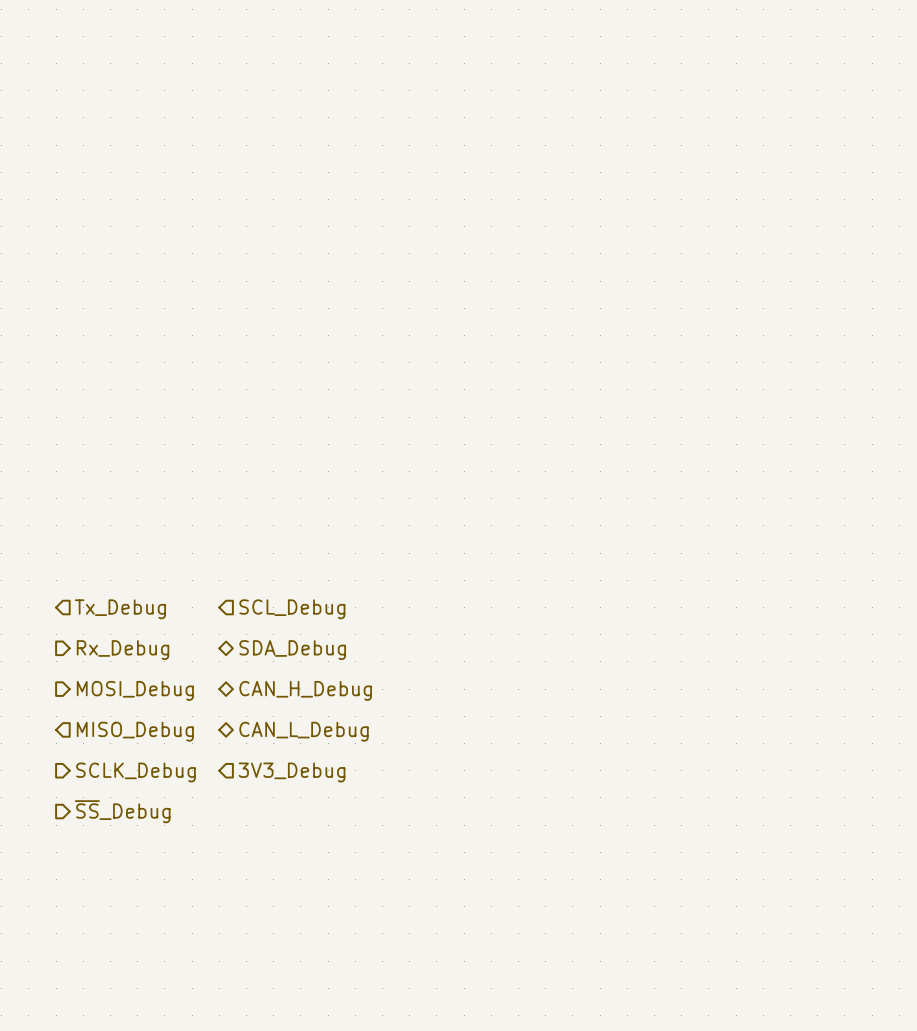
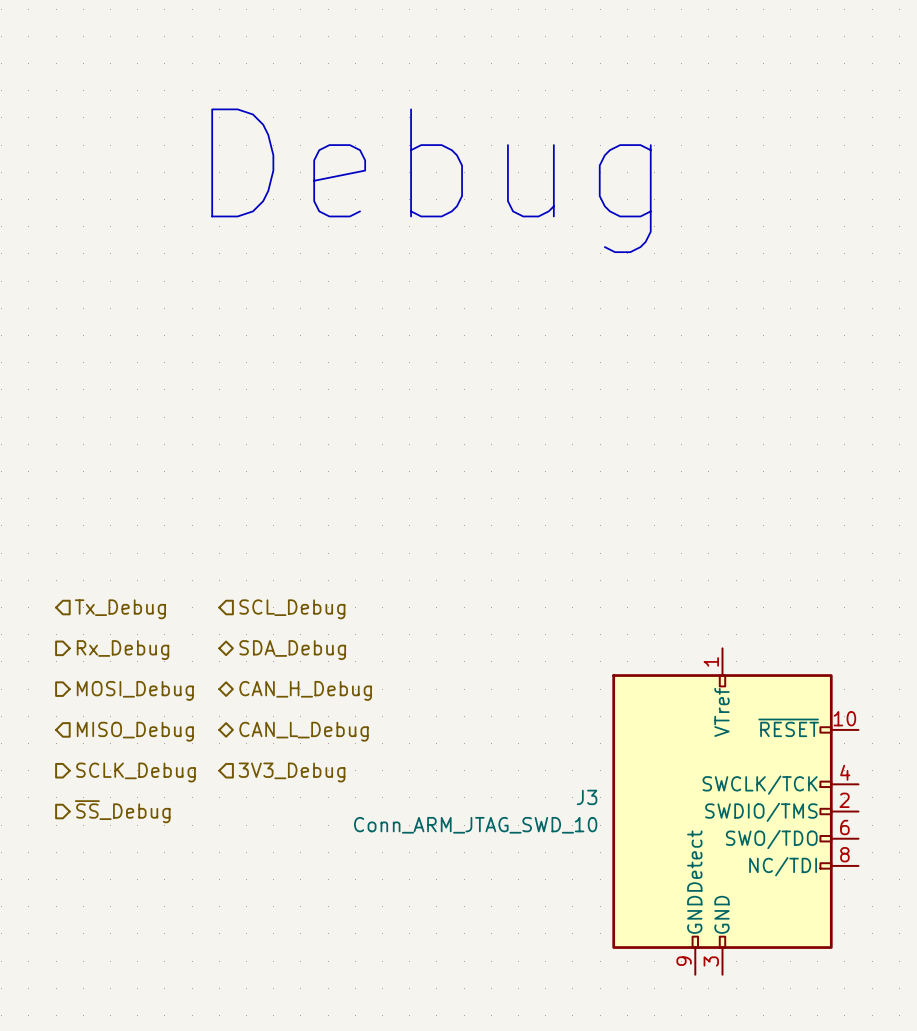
text: none -> Debug (431, 180)
J3: none -> Conn_ARM_JTAG_SWD_10 (735, 811)

